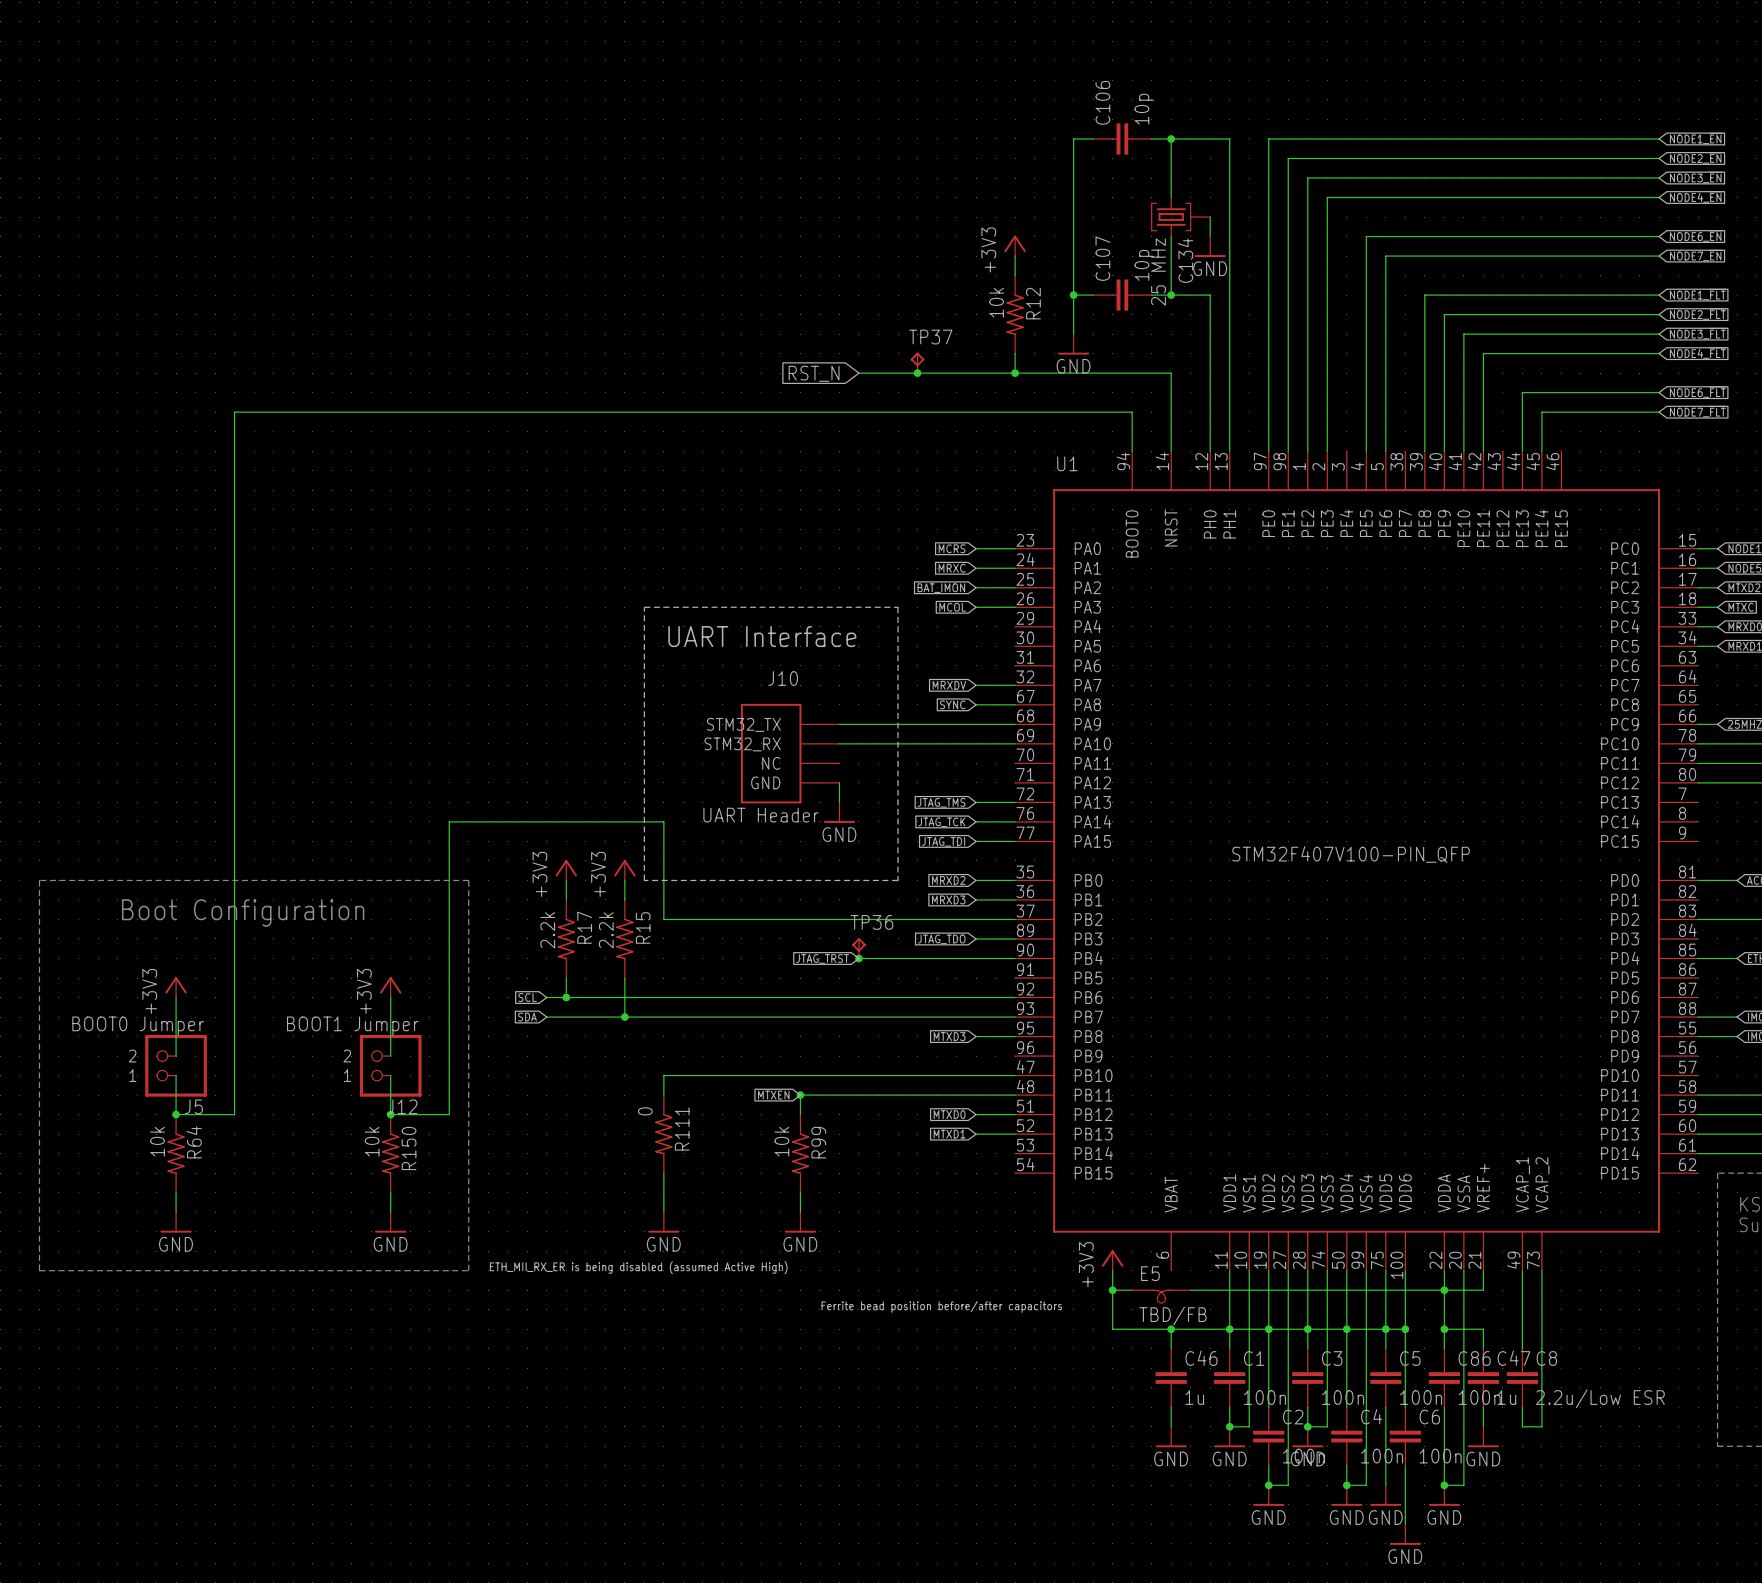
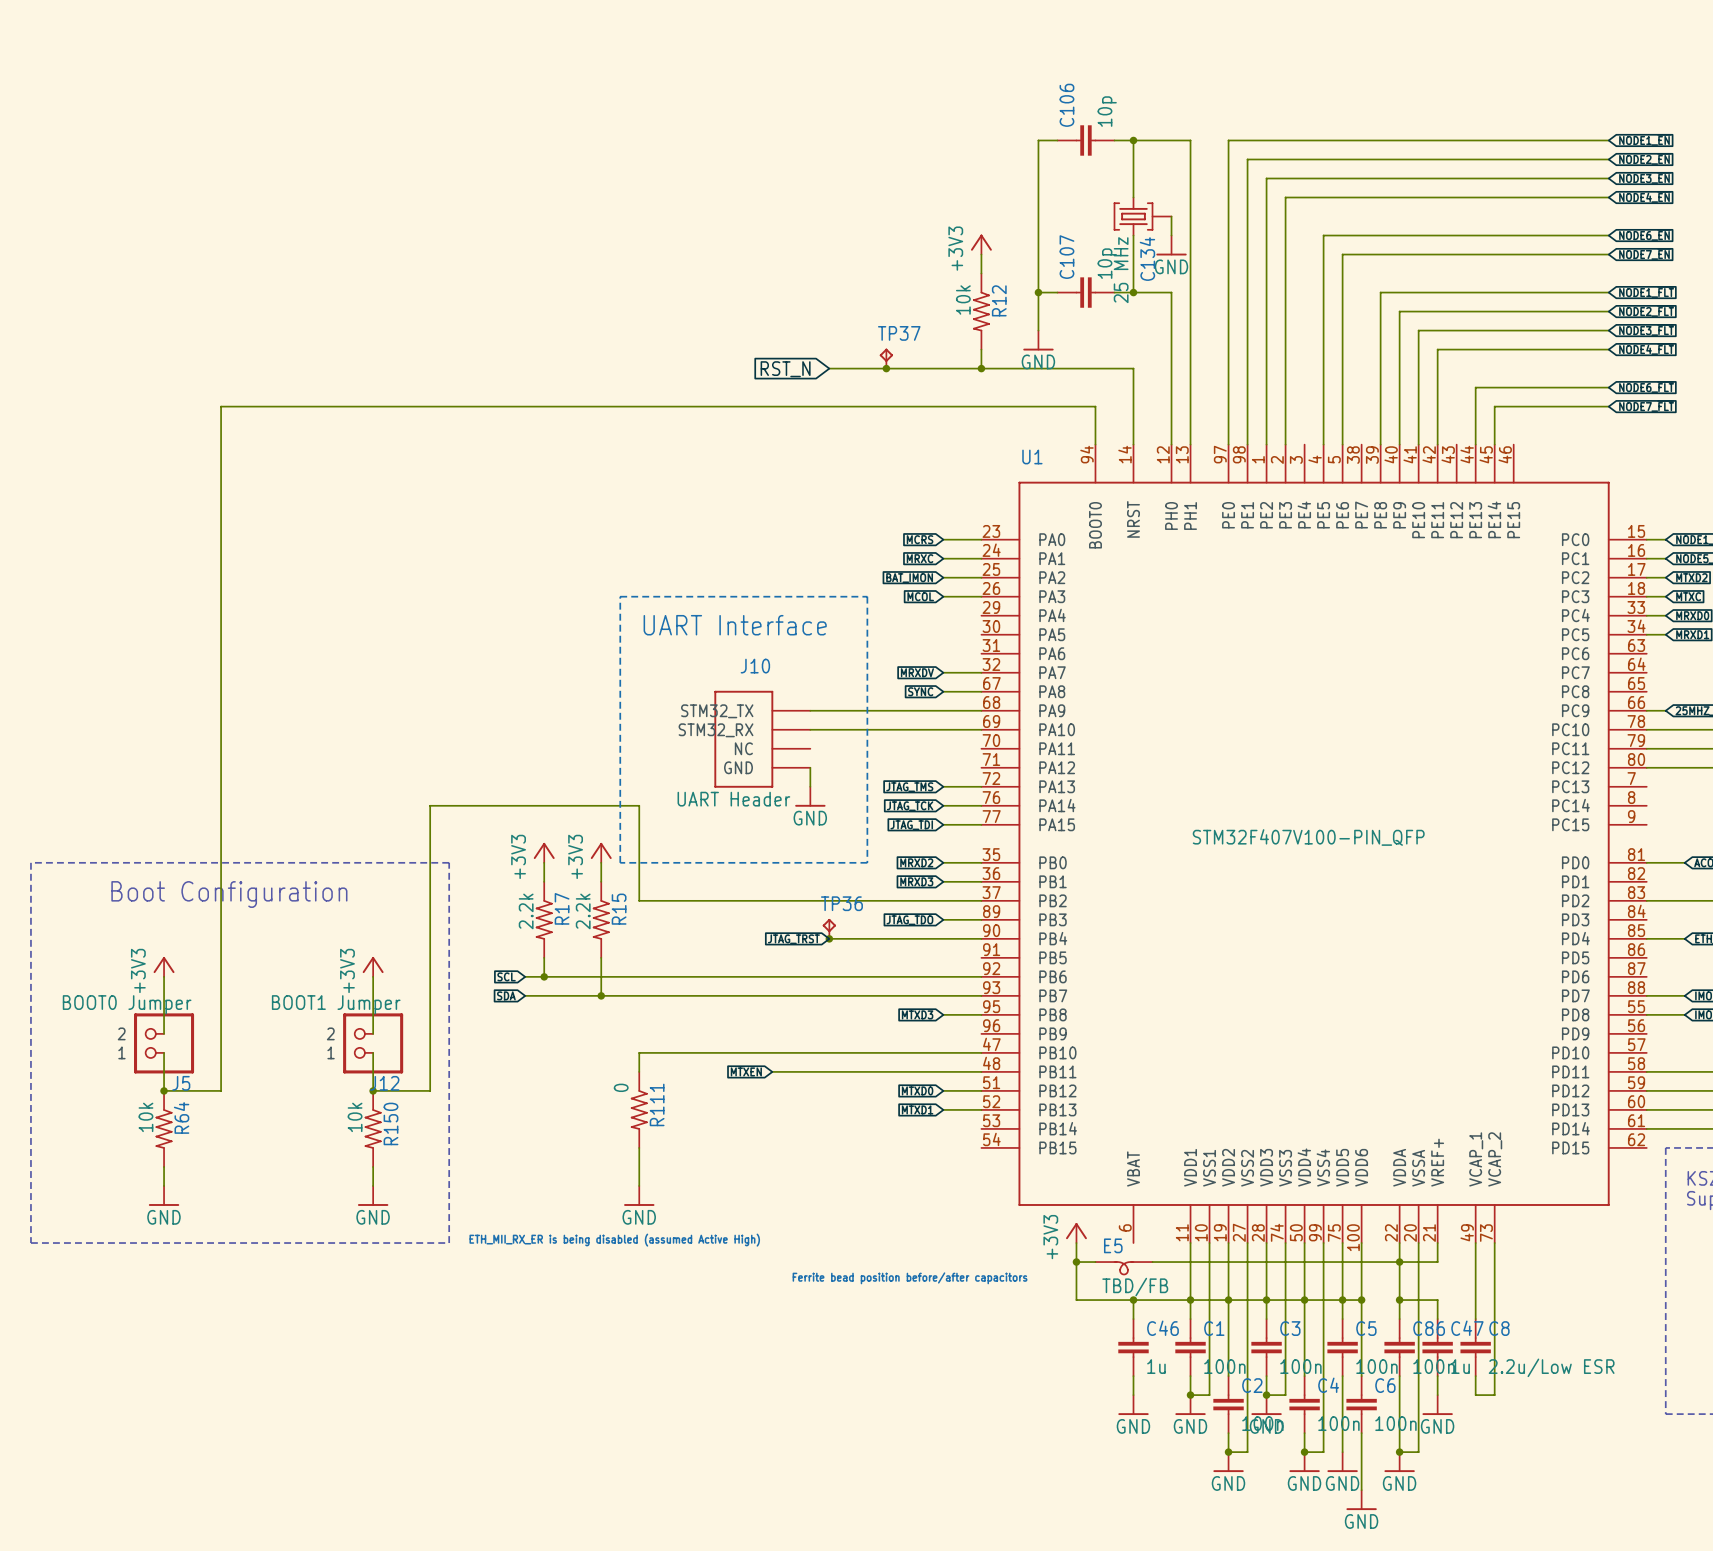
wire: (800, 1095) (800, 1114) -> none
junction: (800, 1095) -> none
R99: 10k (800, 1153) -> none
wire: (800, 1192) (800, 1212) -> none
power symbol: GND (800, 1222) -> none

